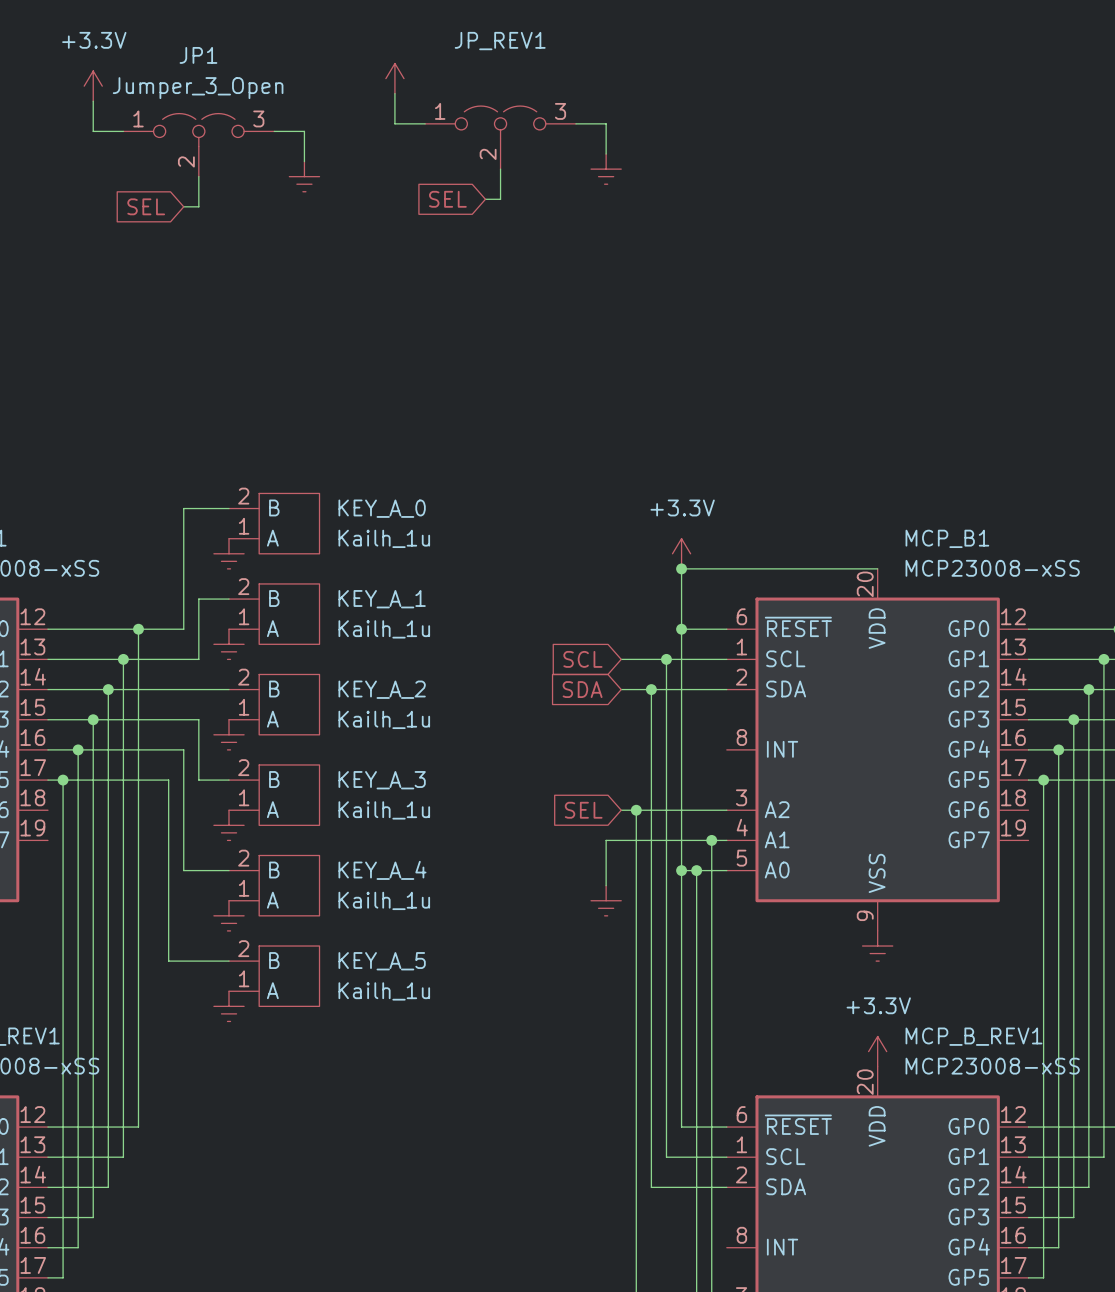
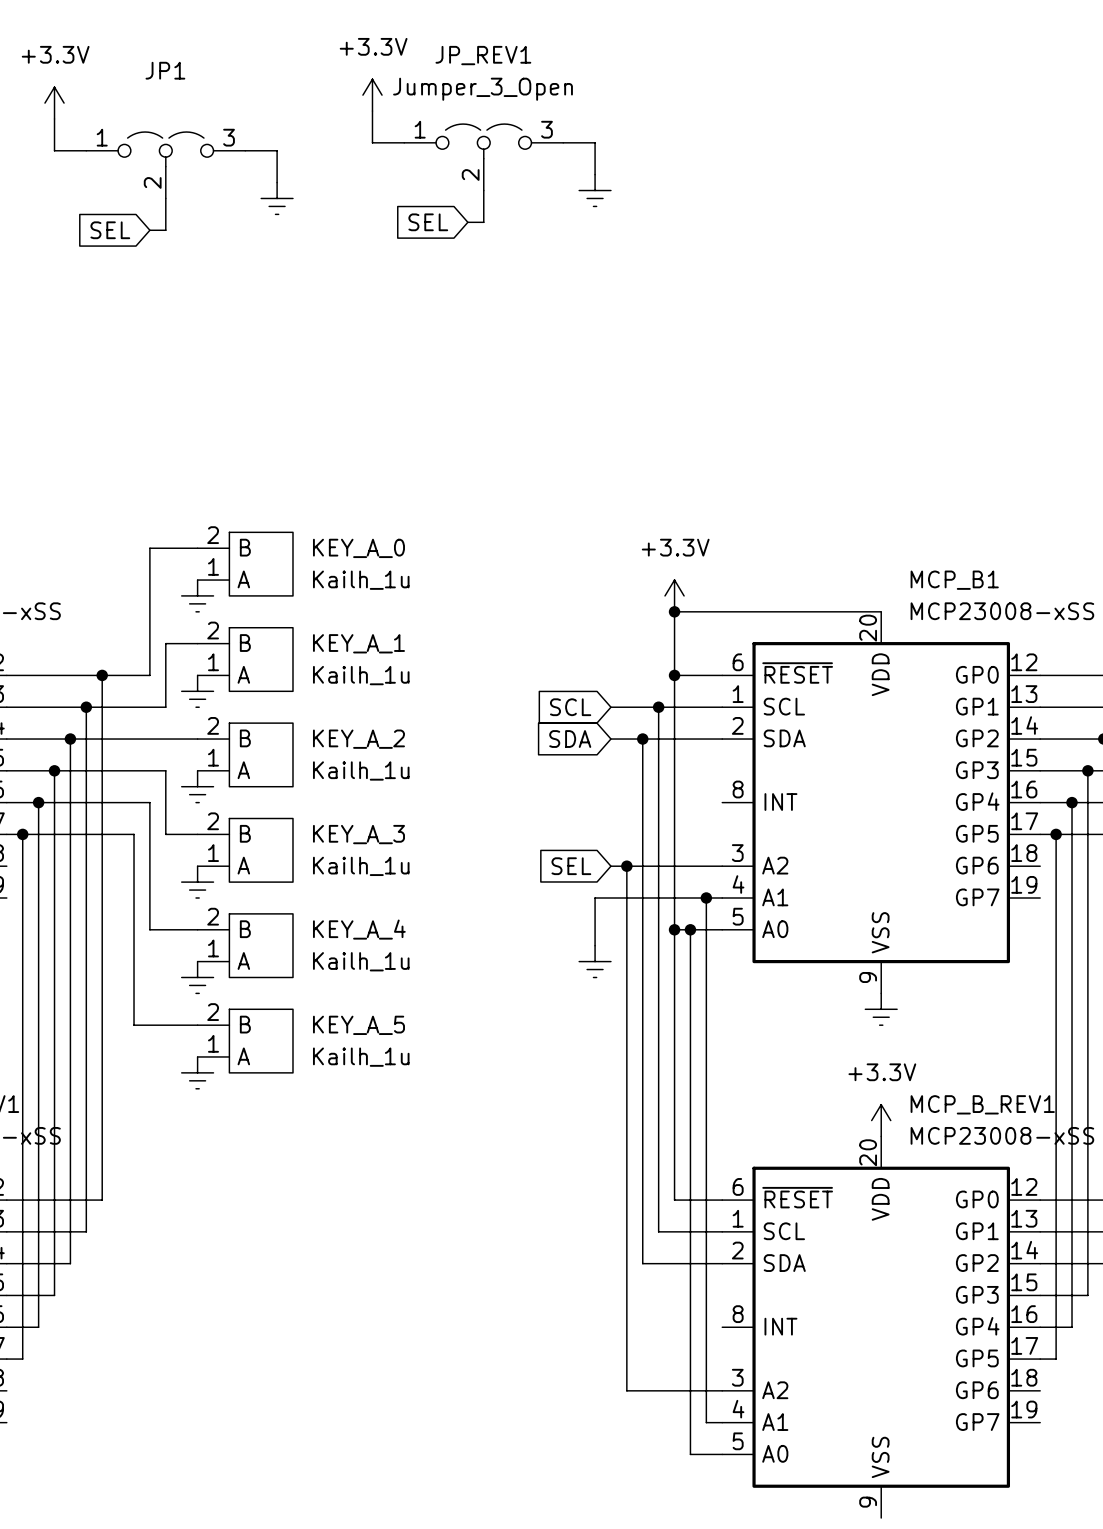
power symbol text: none -> +3.3V (373, 46)
JP_REV1 value: none -> Jumper_3_Open (483, 89)
JP1 value: Jumper_3_Open (198, 88) -> none

